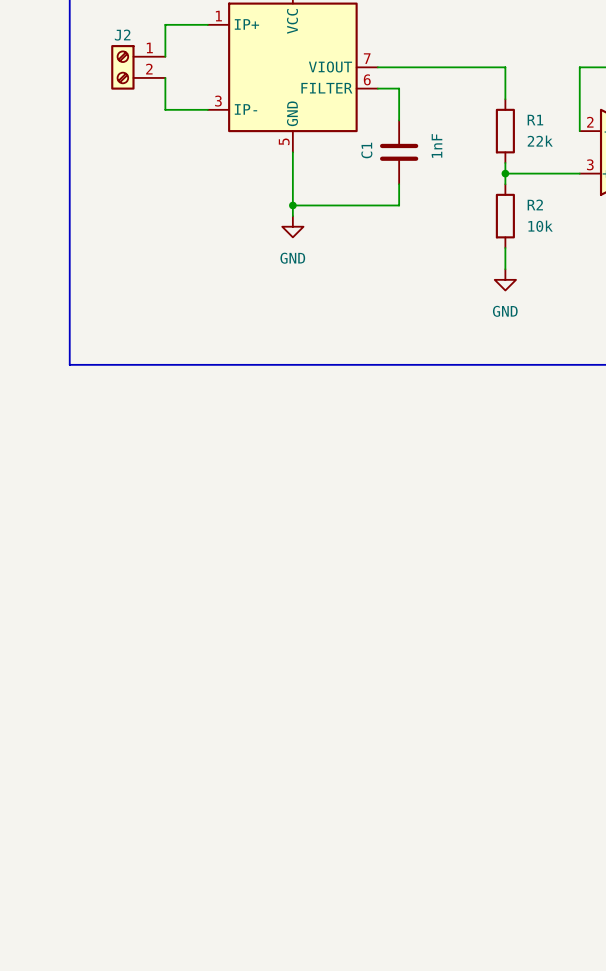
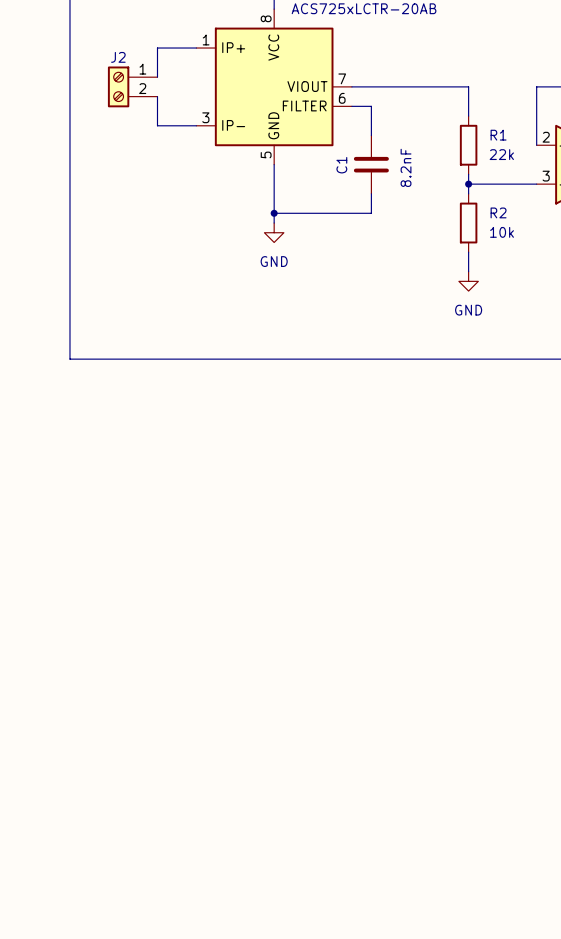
C1 value: 1nF (436, 145) -> 8.2nF (406, 167)

